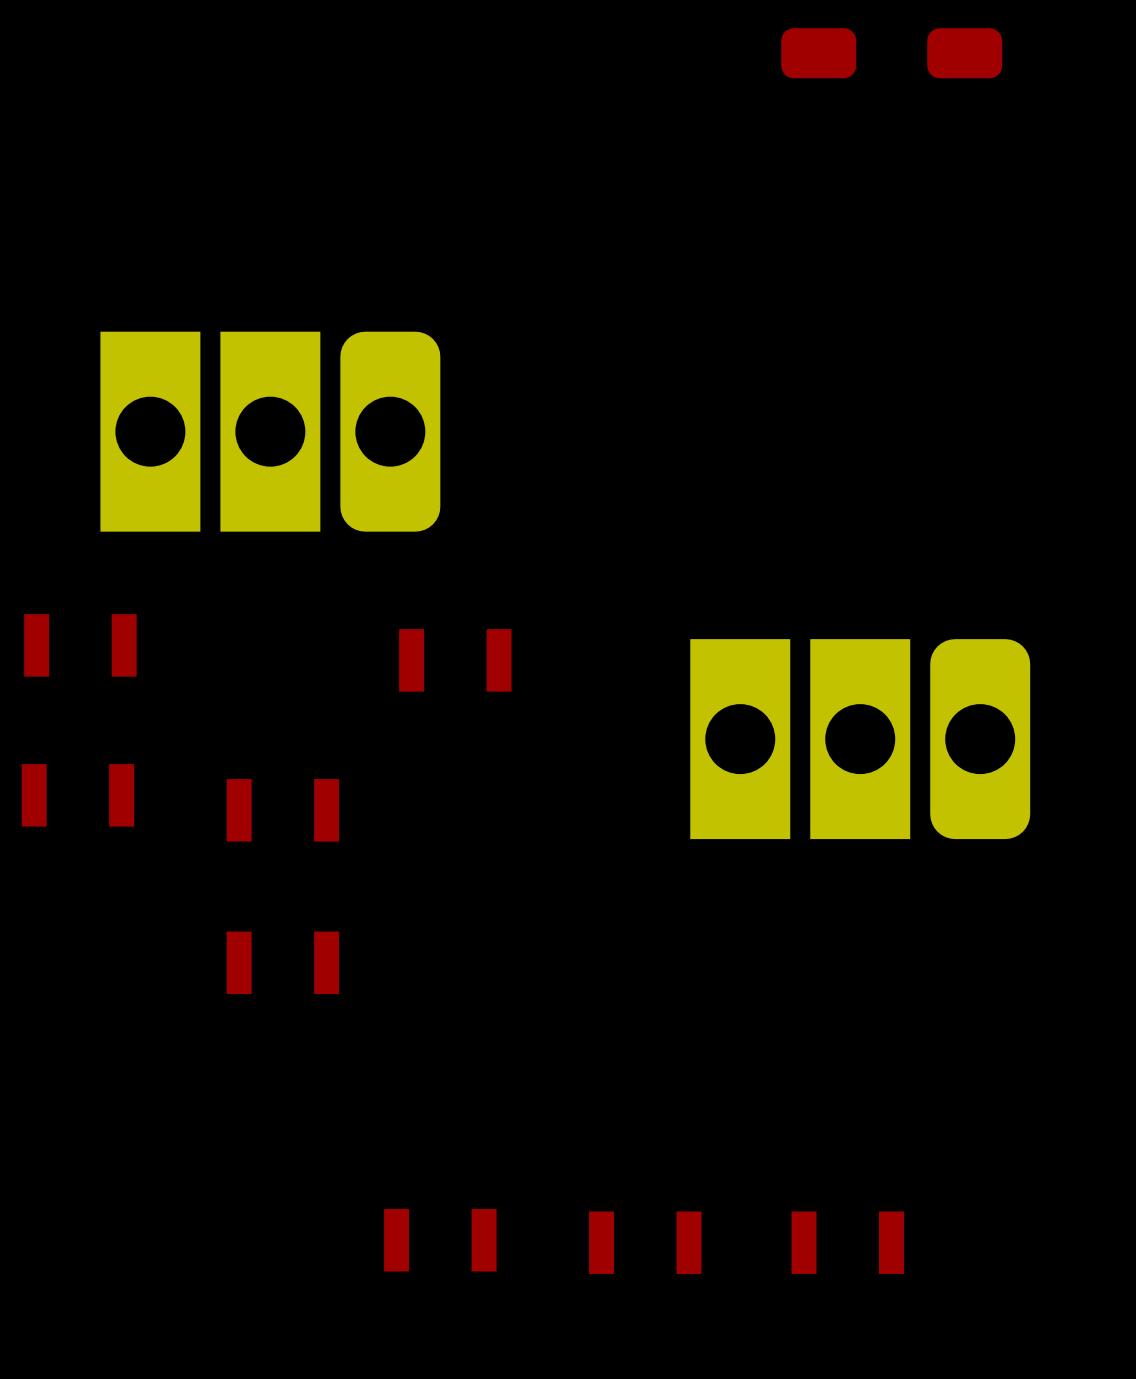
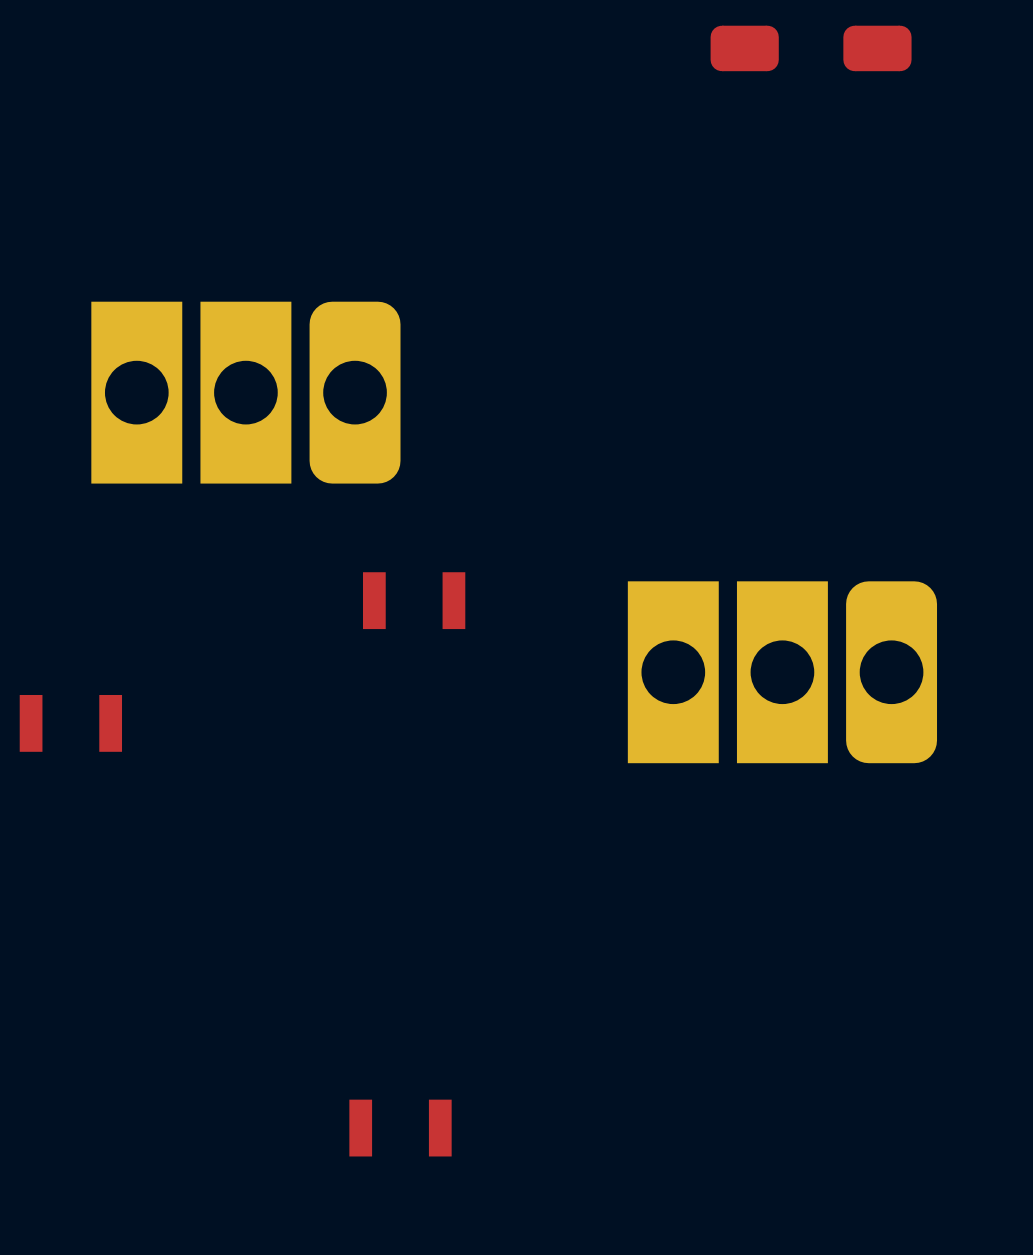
part: (80, 645) -> none
part: (282, 810) -> none
part: (282, 962) -> none
part: (645, 1242) -> none
part: (847, 1242) -> none

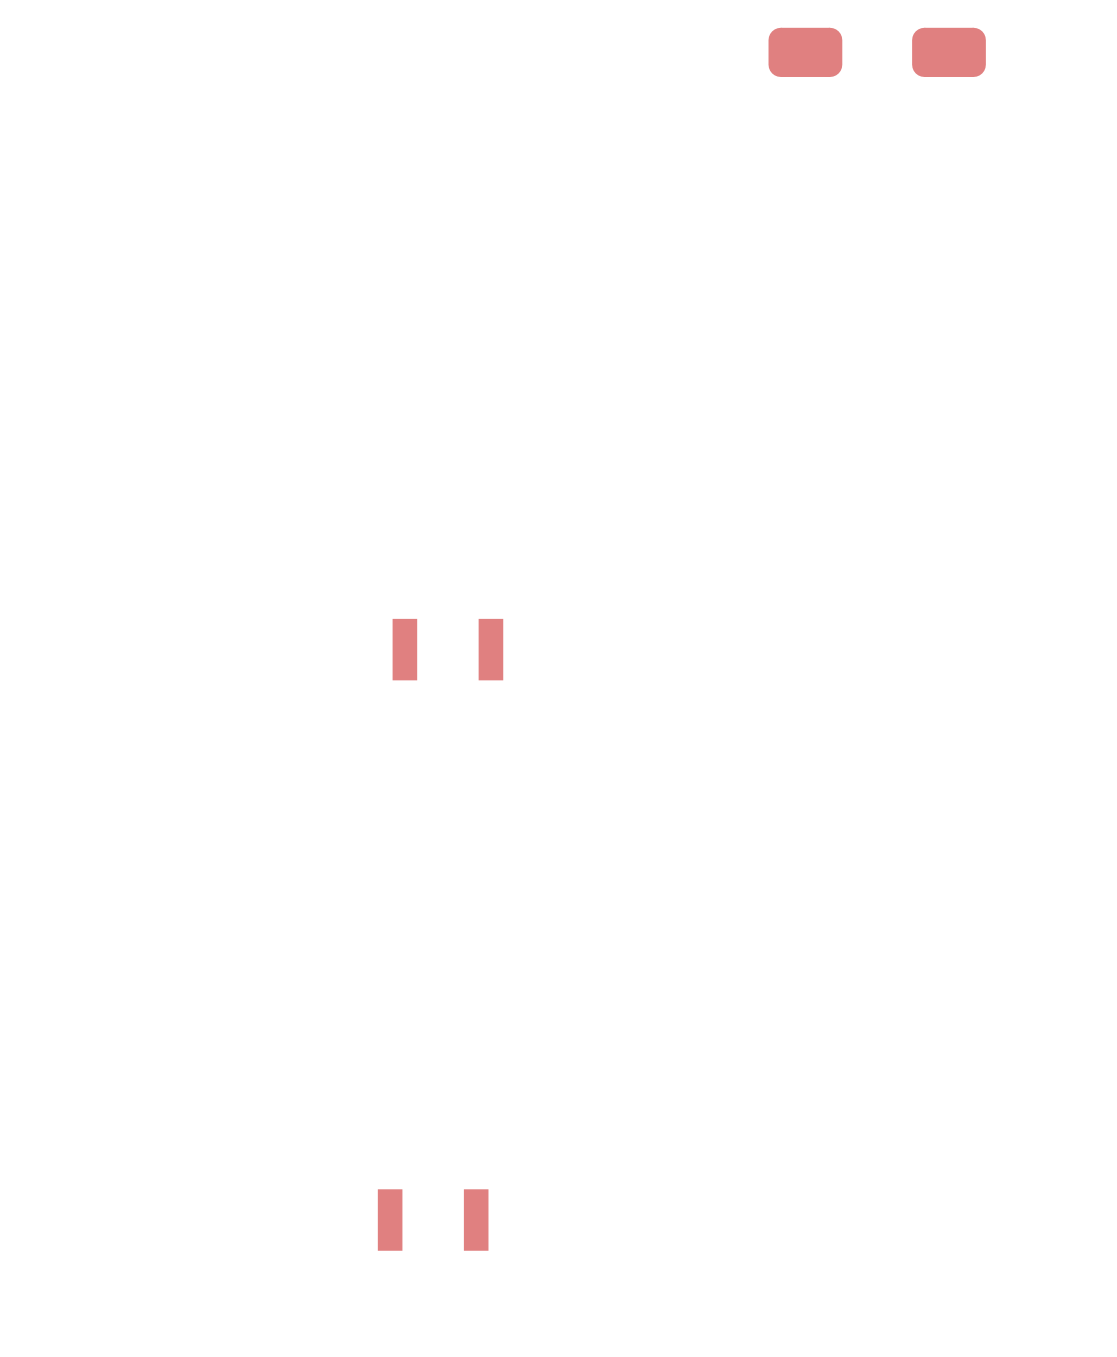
part: (245, 392) -> none
part: (782, 672) -> none
part: (70, 723) -> none

